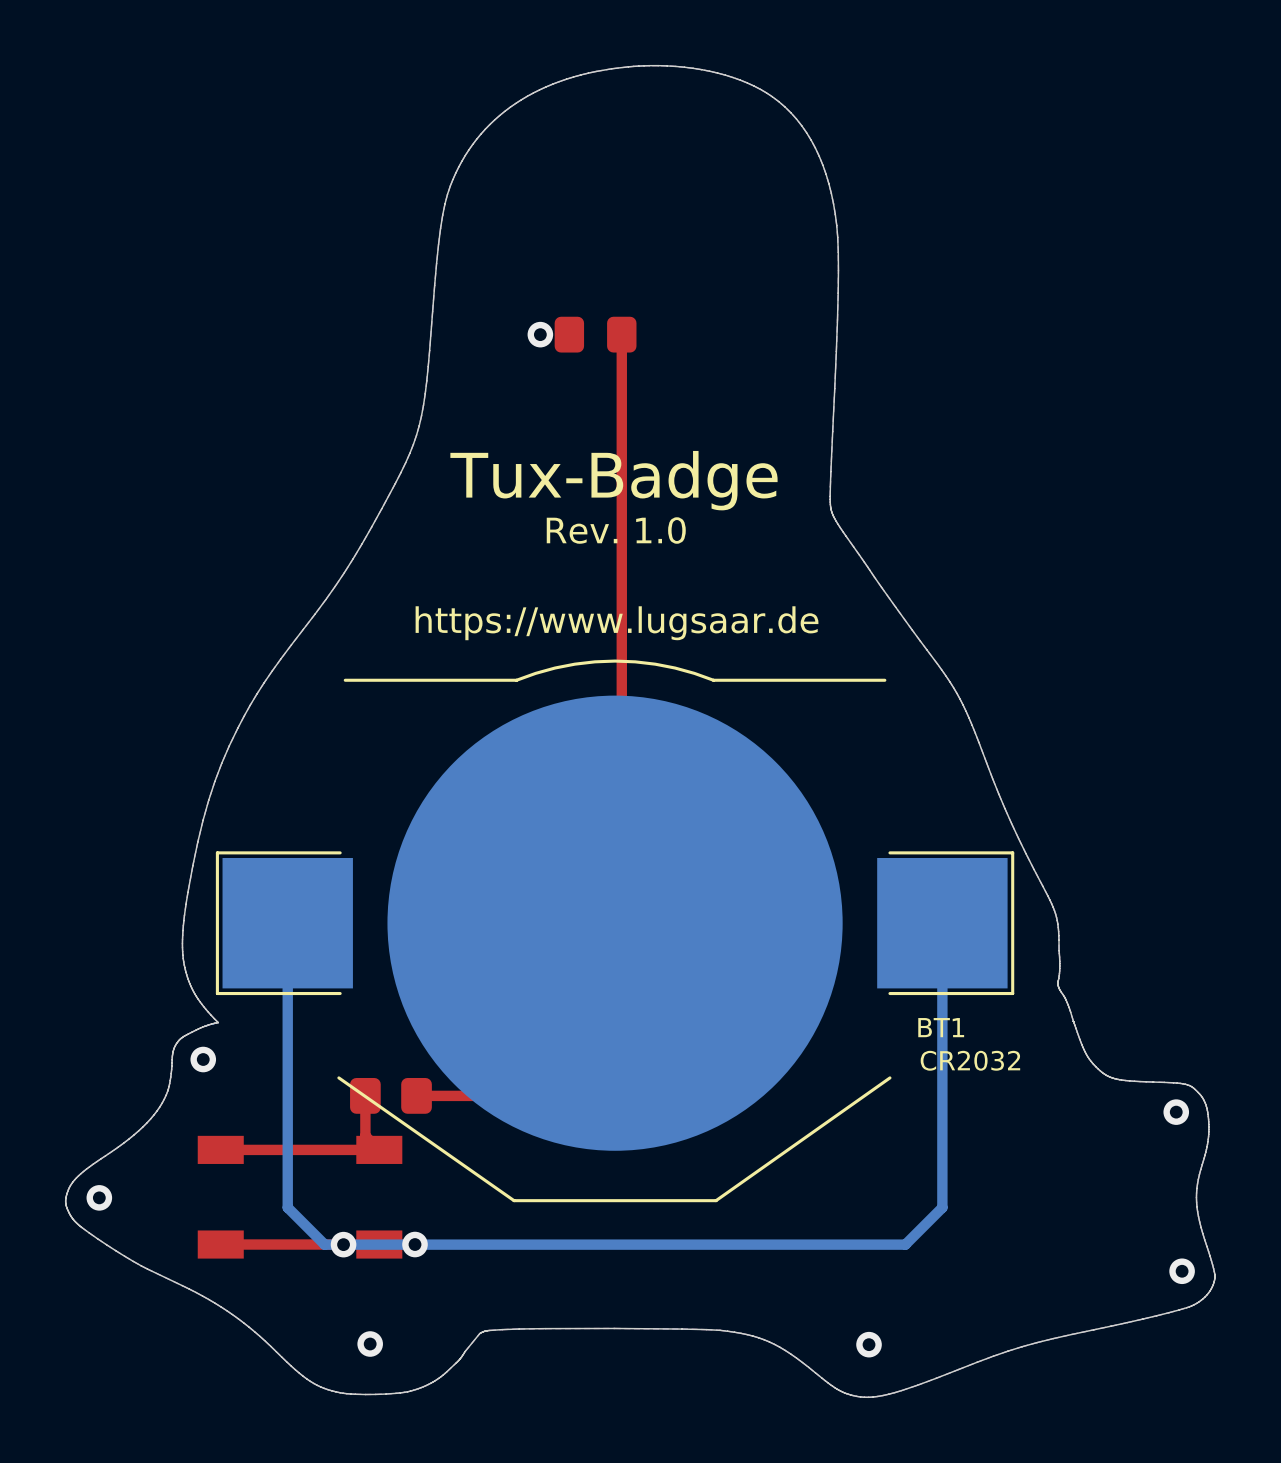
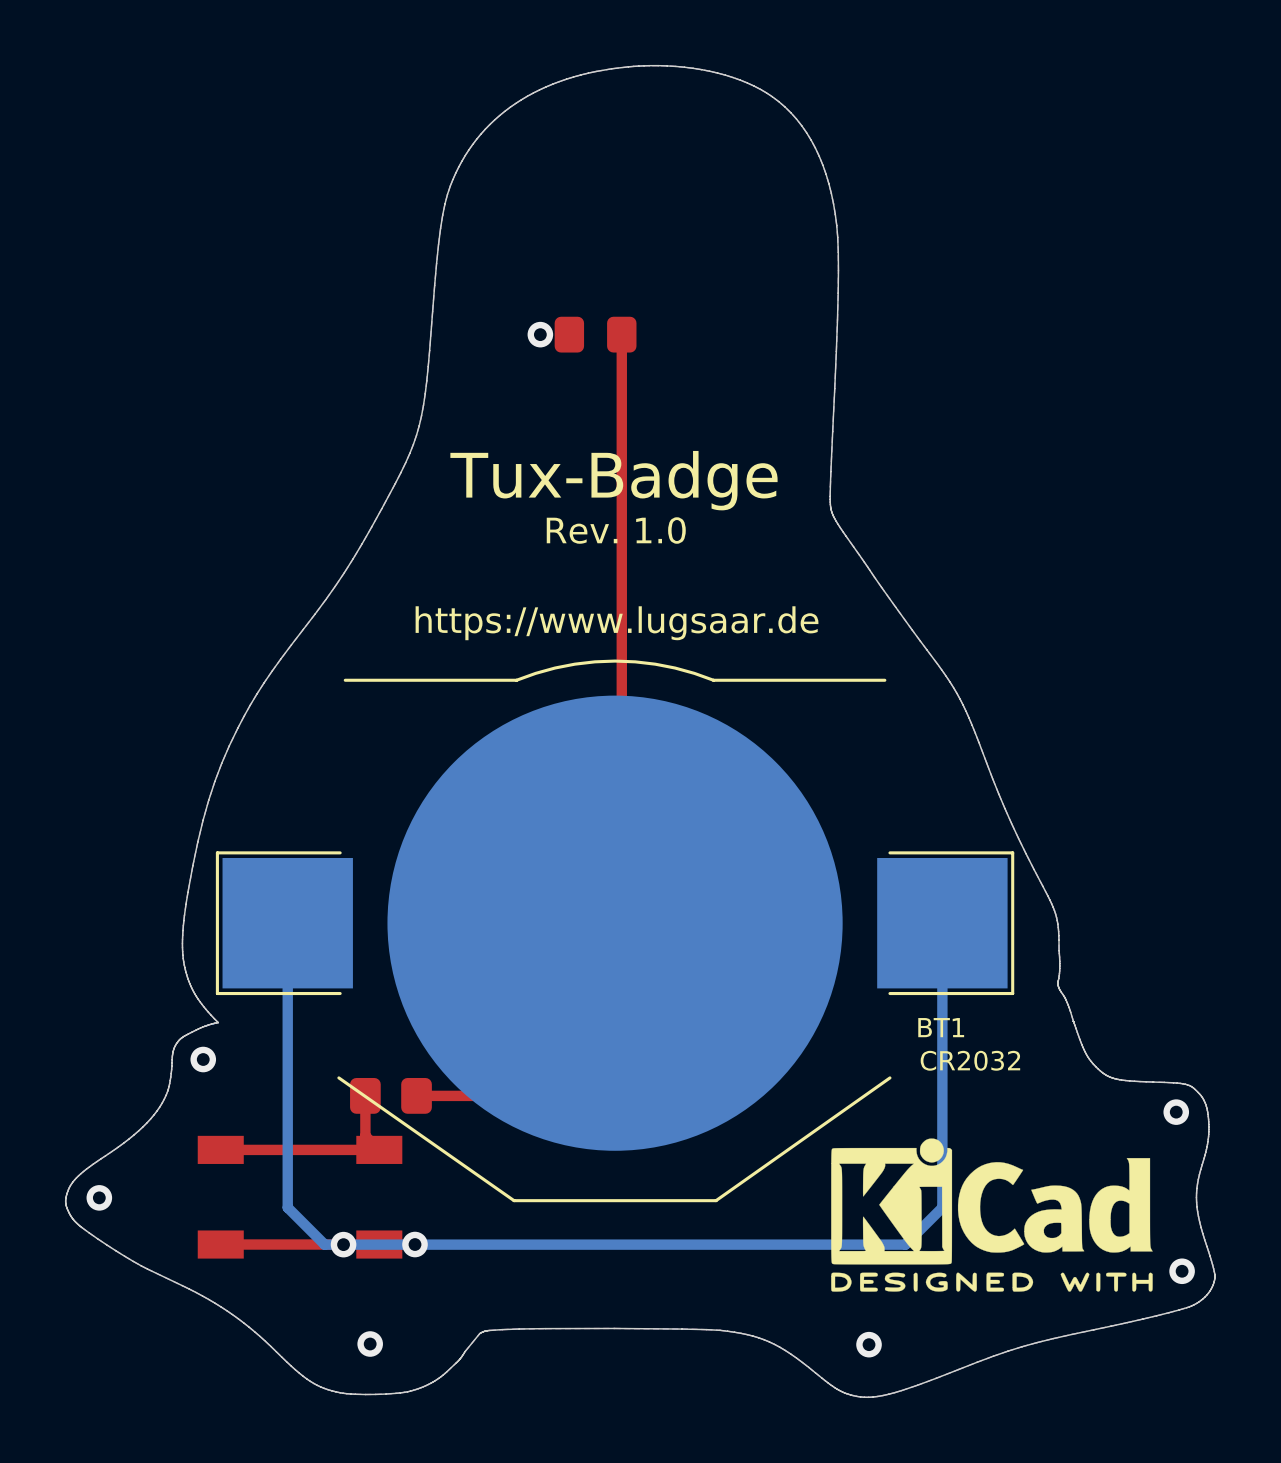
drawing: none -> [831, 1138, 1153, 1292]

